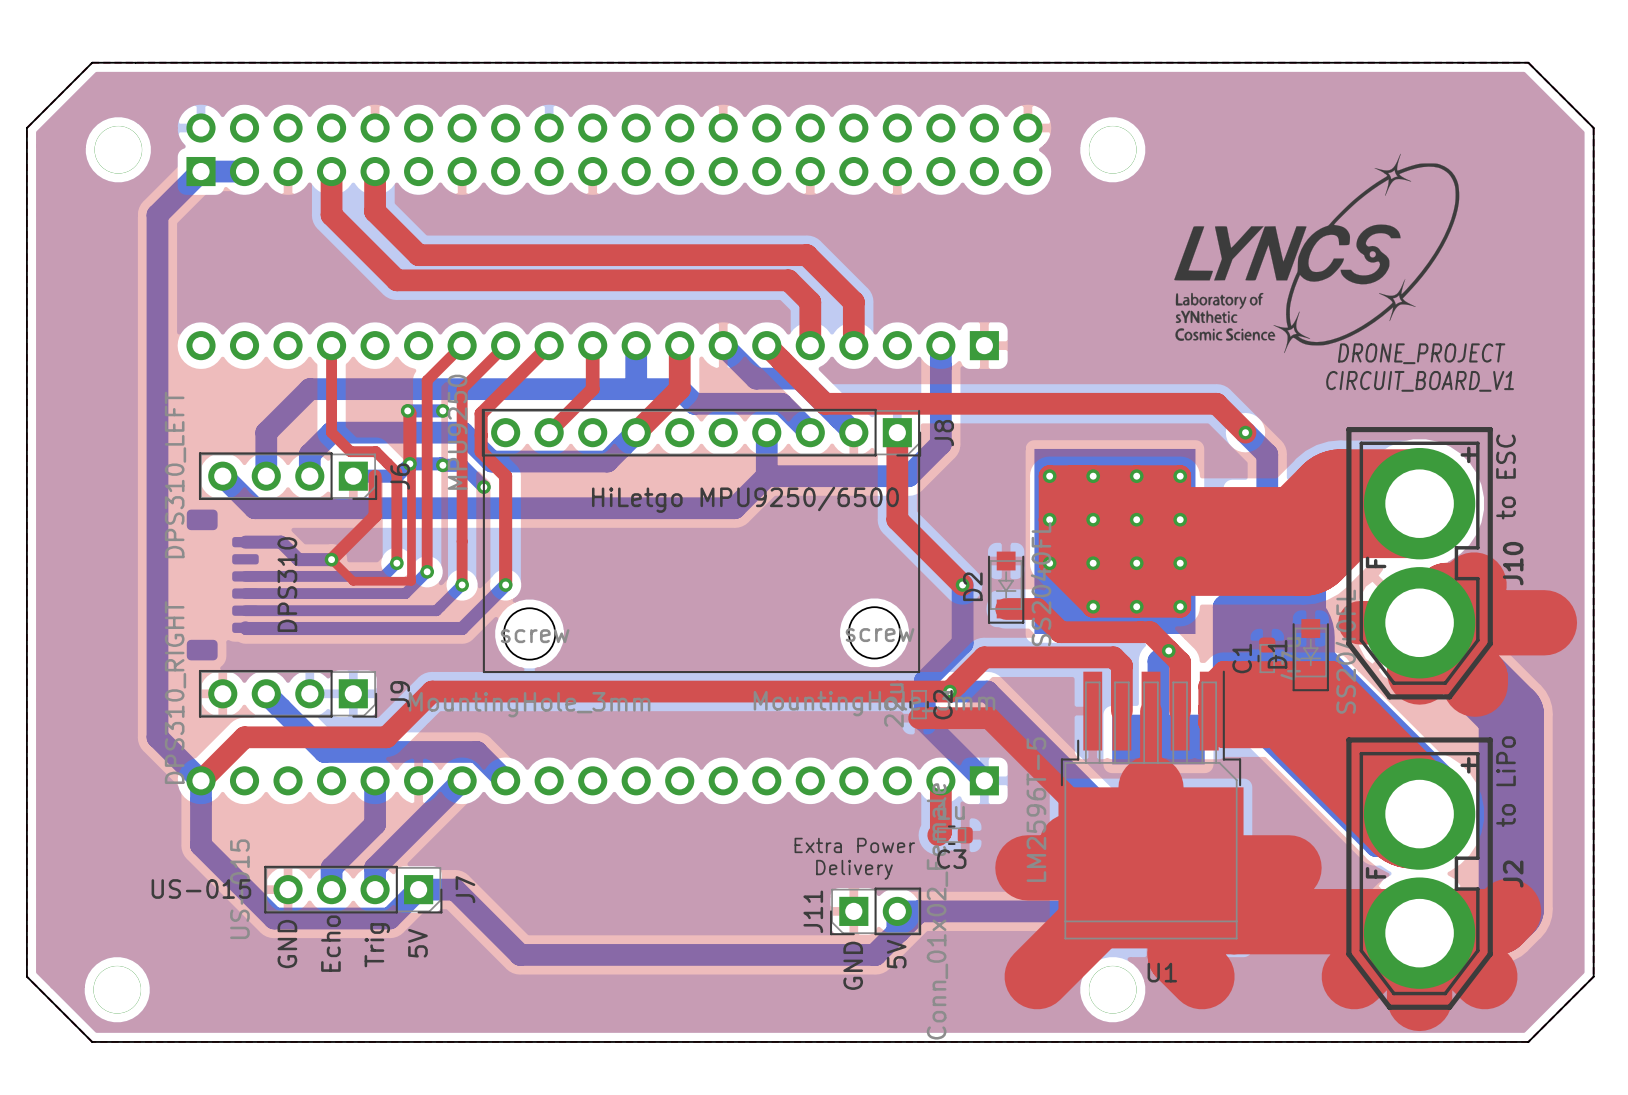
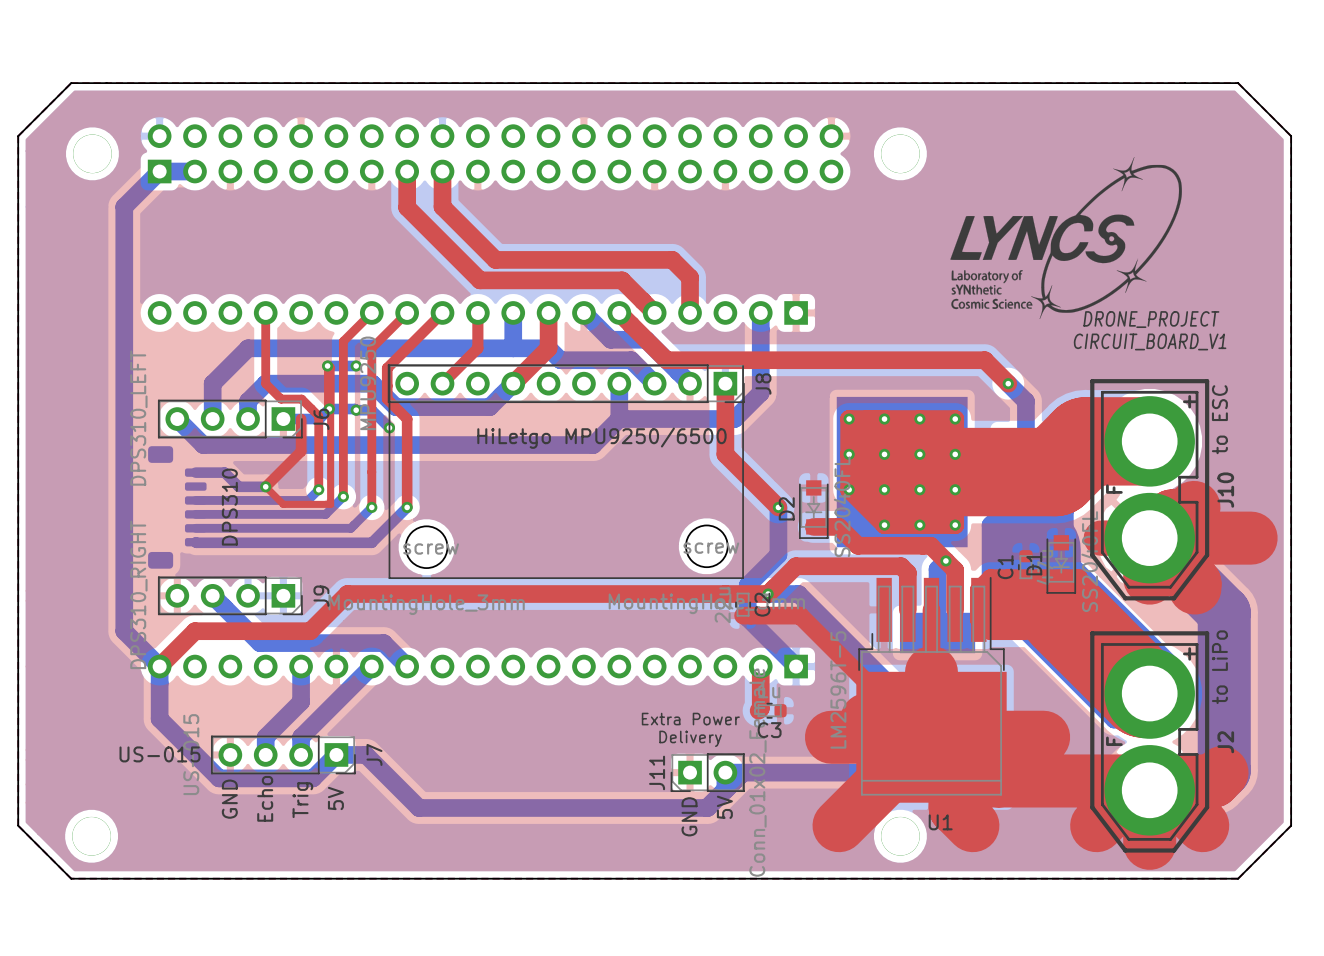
top track: (331, 171) (331, 215) (396, 280) (614, 280) -> (442, 171) (442, 206) (495, 259)
top track: (375, 171) (375, 211) (418, 255) (806, 255) (832, 280) -> none
top track: none -> (407, 171) (407, 207) (480, 280) (622, 280) (654, 312)
top track: (788, 280) (810, 302) (810, 345) -> (636, 259) (672, 259)

